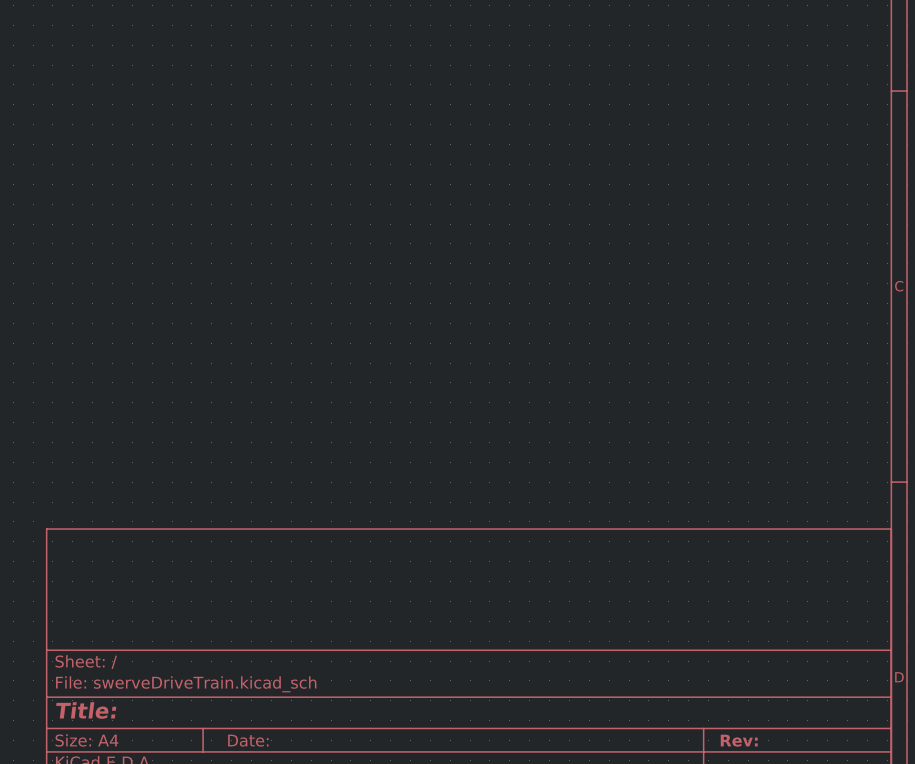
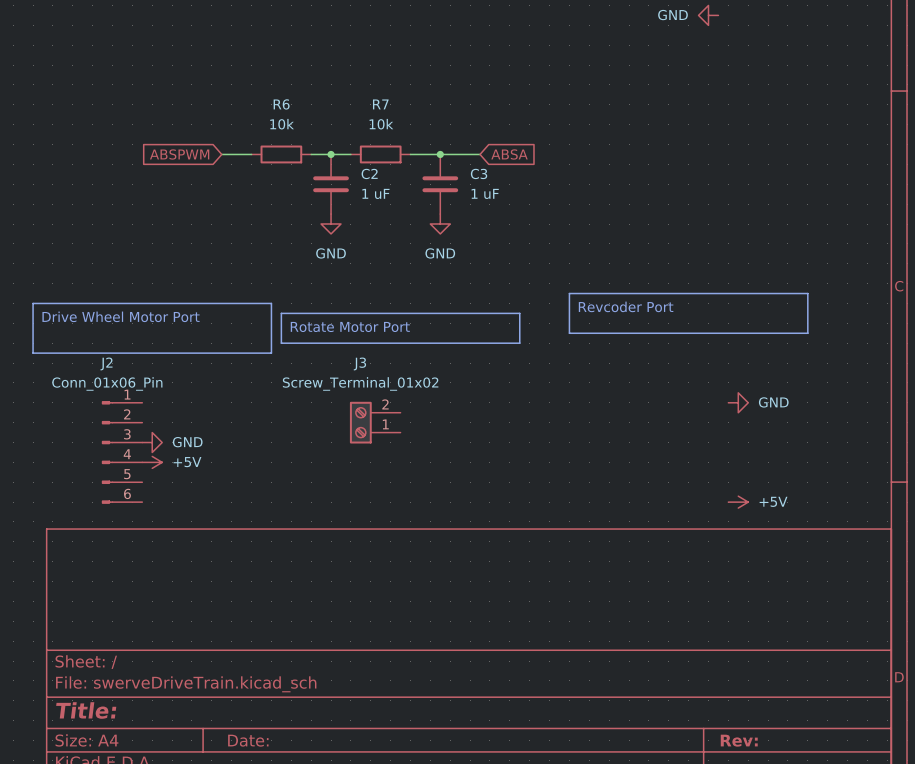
power symbol: none -> GND (708, 15)
global label: none -> ABSPWM (179, 154)
wire: none -> (221, 154) (251, 154)
R6: none -> 10k (281, 154)
wire: none -> (311, 154) (350, 154)
junction: none -> (331, 154)
R7: none -> 10k (380, 154)
wire: none -> (410, 154) (480, 154)
junction: none -> (440, 154)
global label: none -> ABSA (509, 154)
C2: none -> 1 uF (331, 184)
C3: none -> 1 uF (440, 184)
power symbol: none -> GND (331, 224)
power symbol: none -> GND (440, 224)
line: none -> (569, 293) (807, 293) (807, 333) (569, 333) (569, 293)
line: none -> (33, 303) (271, 303) (271, 353) (33, 353) (33, 303)
text: none -> Revcoder Port (626, 306)
line: none -> (281, 313) (519, 313) (519, 343) (281, 343) (281, 313)
text: none -> Drive Wheel Motor Port (121, 316)
text: none -> Rotate Motor Port (350, 326)
power symbol: none -> GND (738, 402)
J3: none -> Screw_Terminal_01x02 (375, 422)
power symbol: none -> GND (152, 442)
J2: none -> Conn_01x06_Pin (122, 452)
power symbol: none -> +5V (152, 462)
power symbol: none -> +5V (738, 502)

